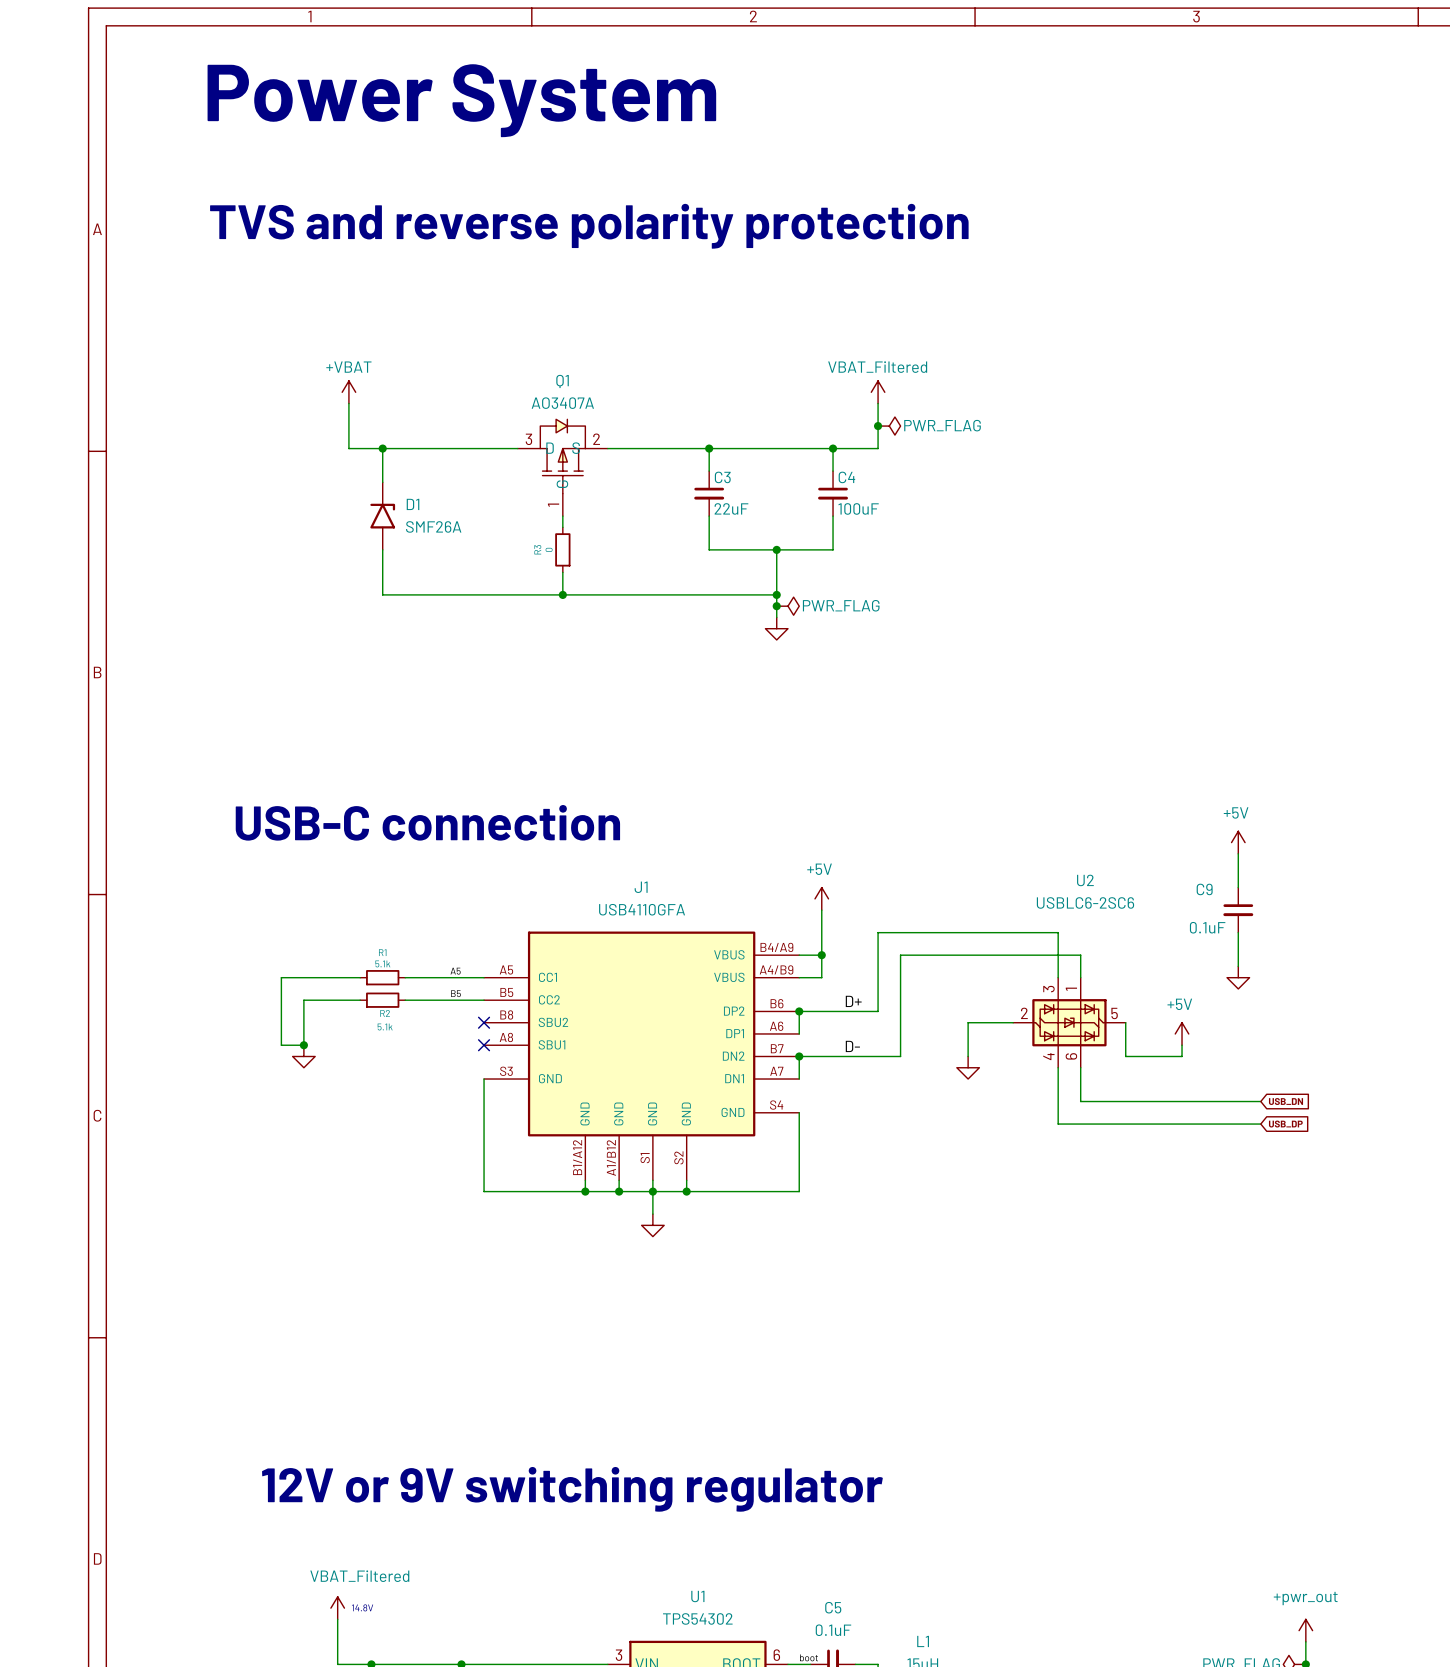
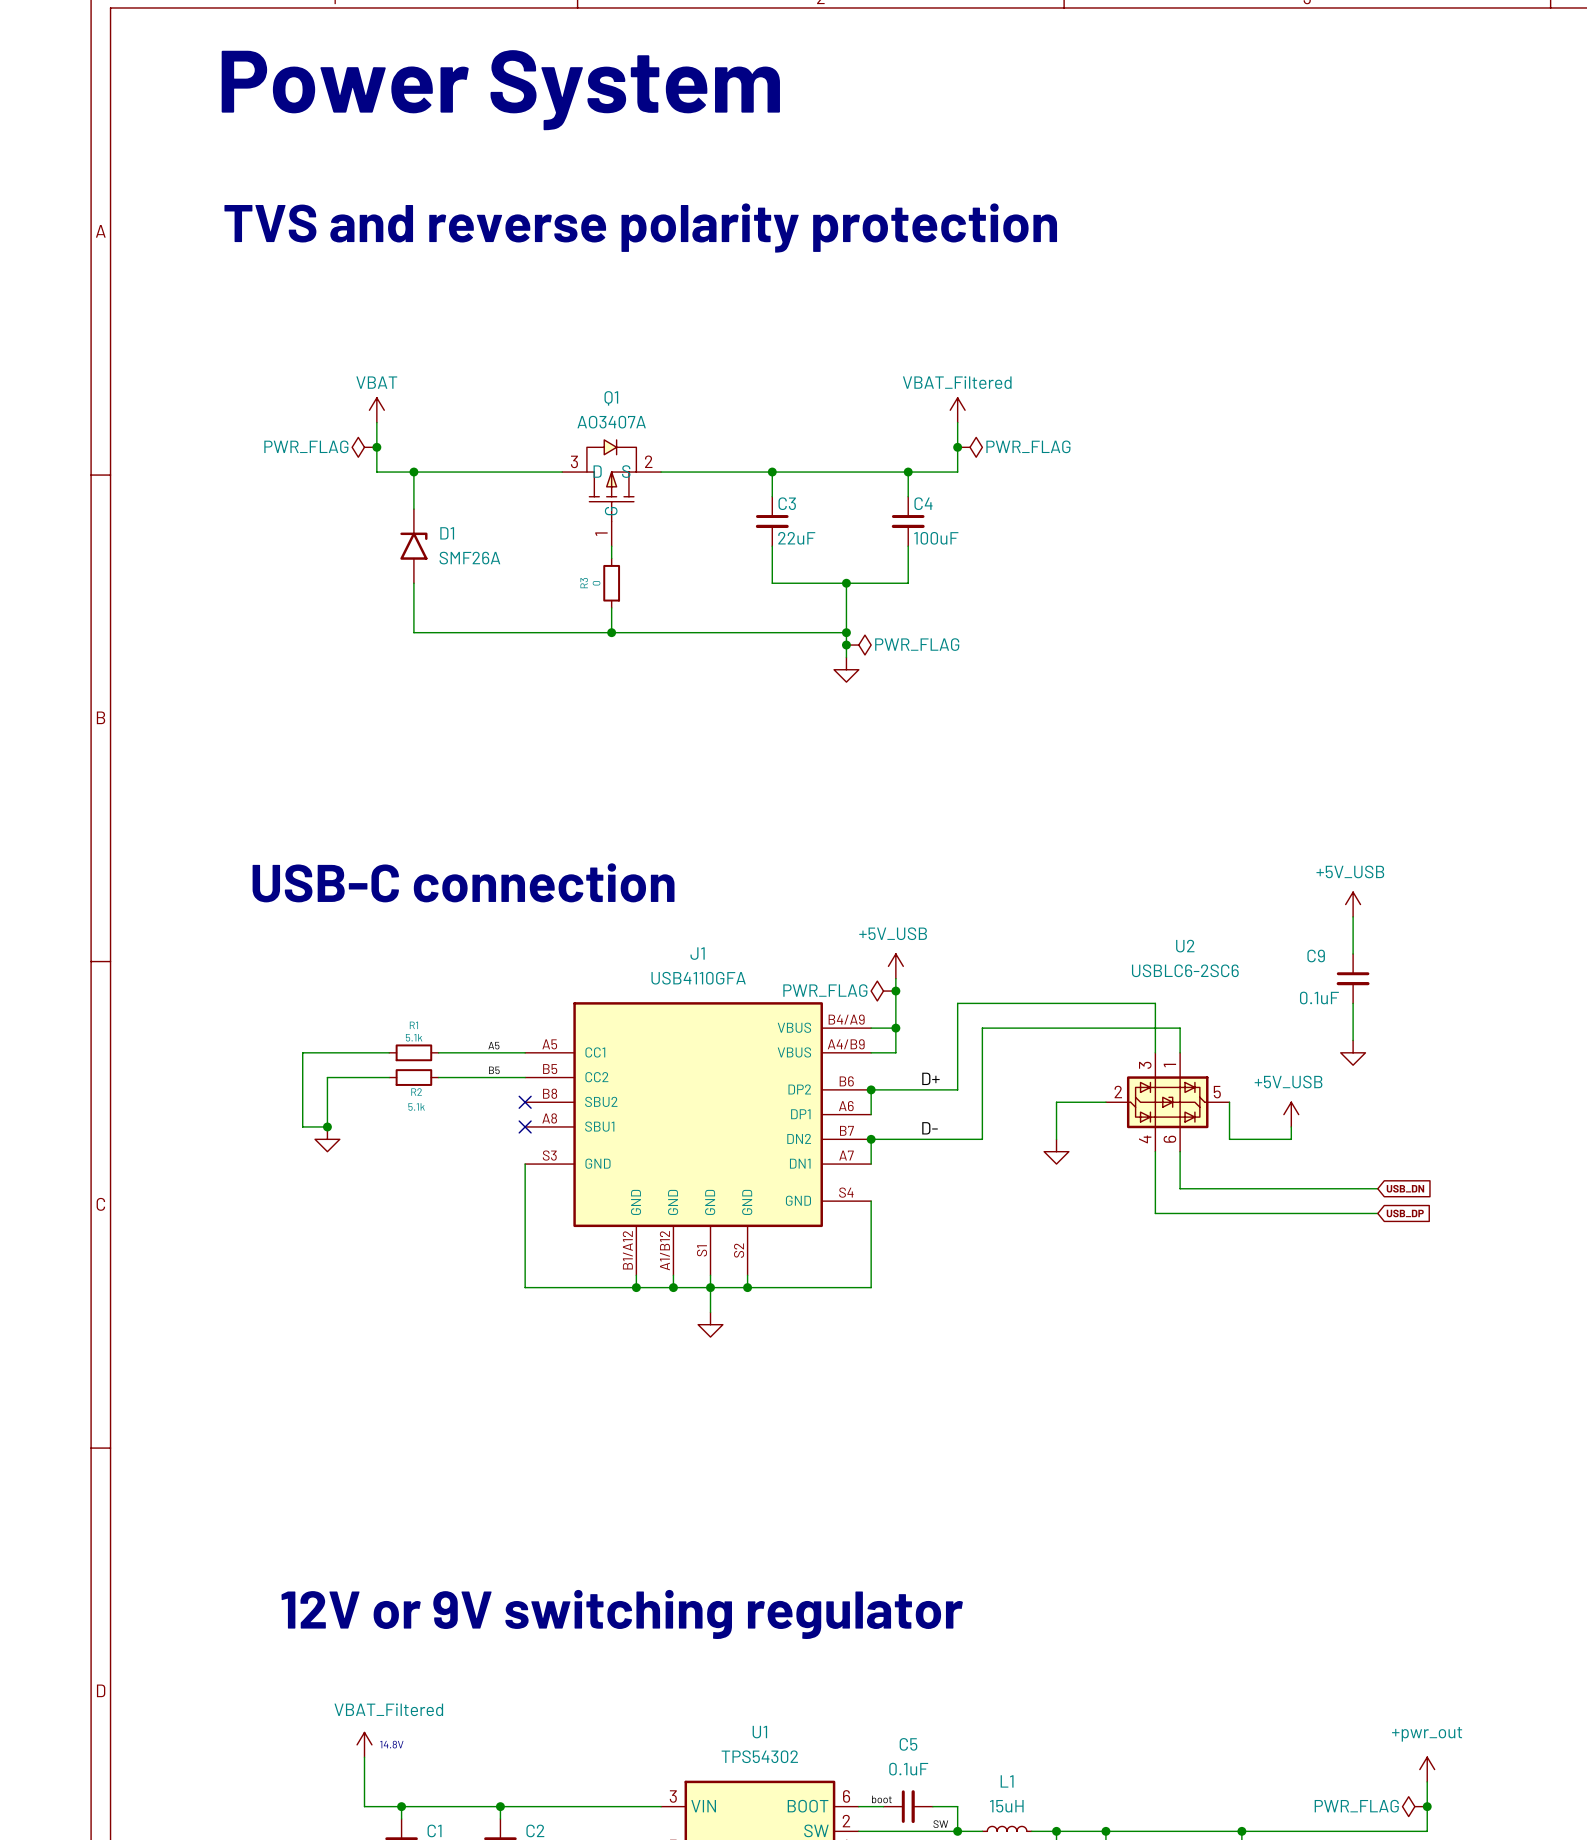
power symbol: +VBAT (348, 392) -> VBAT (376, 410)
power symbol: none -> PWR_FLAG (364, 447)
junction: none -> (376, 447)
power symbol: +5V (1238, 842) -> +5V_USB (1353, 904)
power symbol: +5V (821, 898) -> +5V_USB (895, 966)
power symbol: none -> PWR_FLAG (883, 991)
junction: none -> (895, 991)
power symbol: +5V (1182, 1033) -> +5V_USB (1291, 1114)

